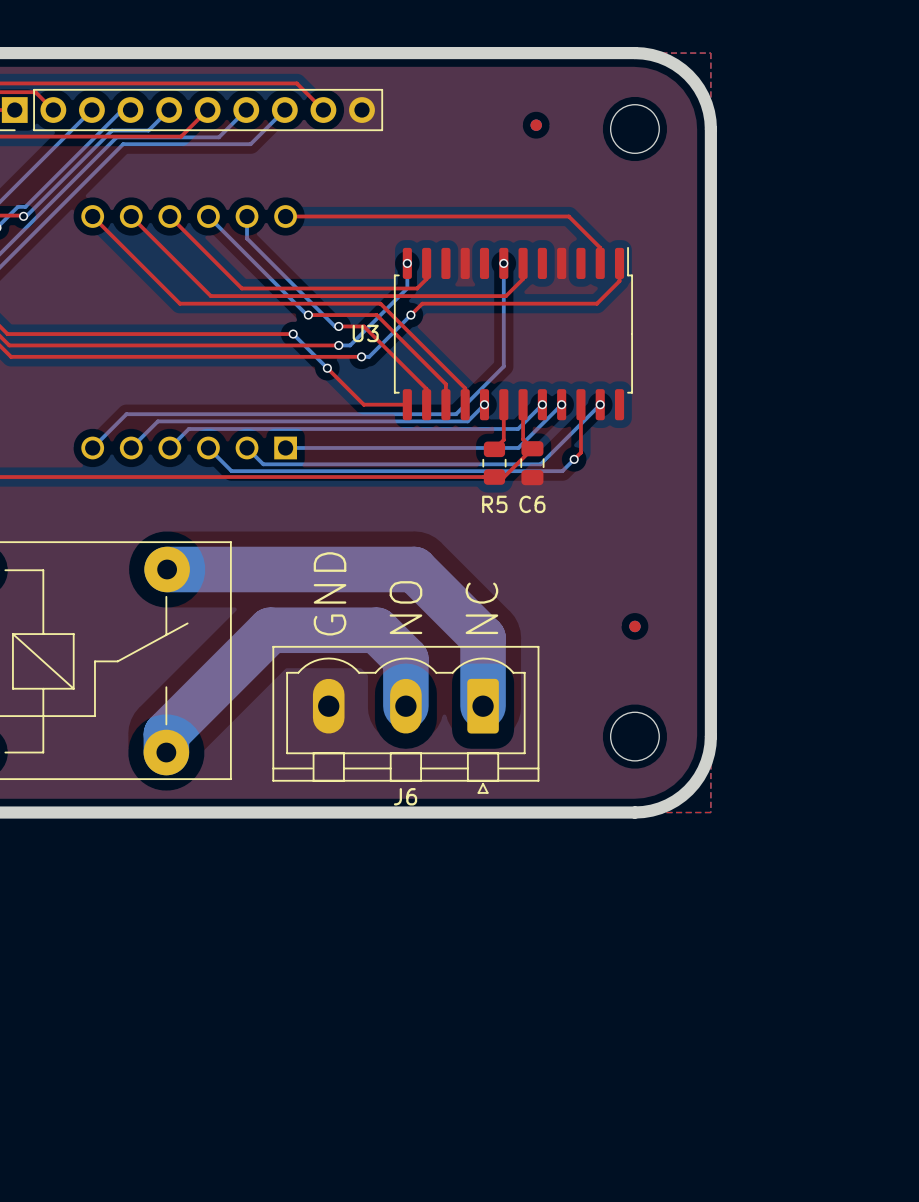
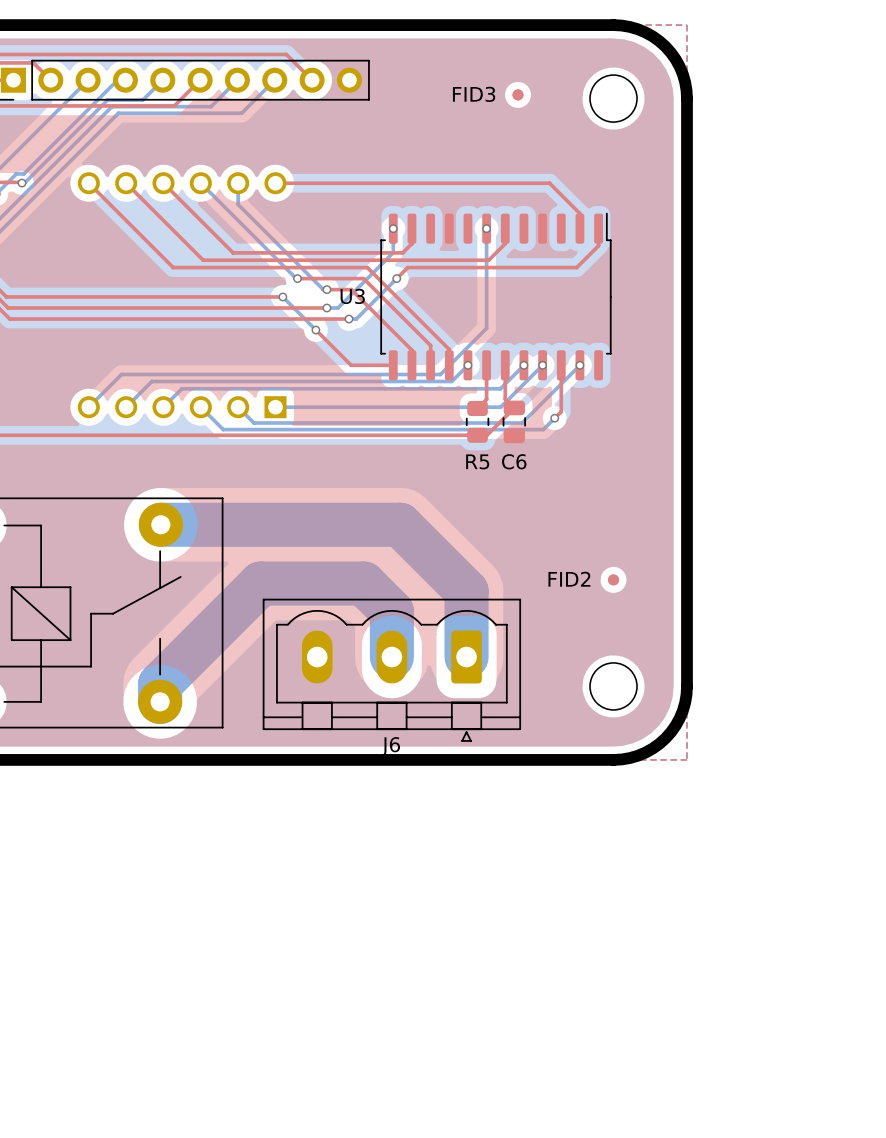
FID3 name: none -> FID3 (474, 94)
text: GND (330, 593) -> none
text: NO (405, 607) -> none
text: NC (481, 608) -> none
FID2 name: none -> FID2 (569, 579)

